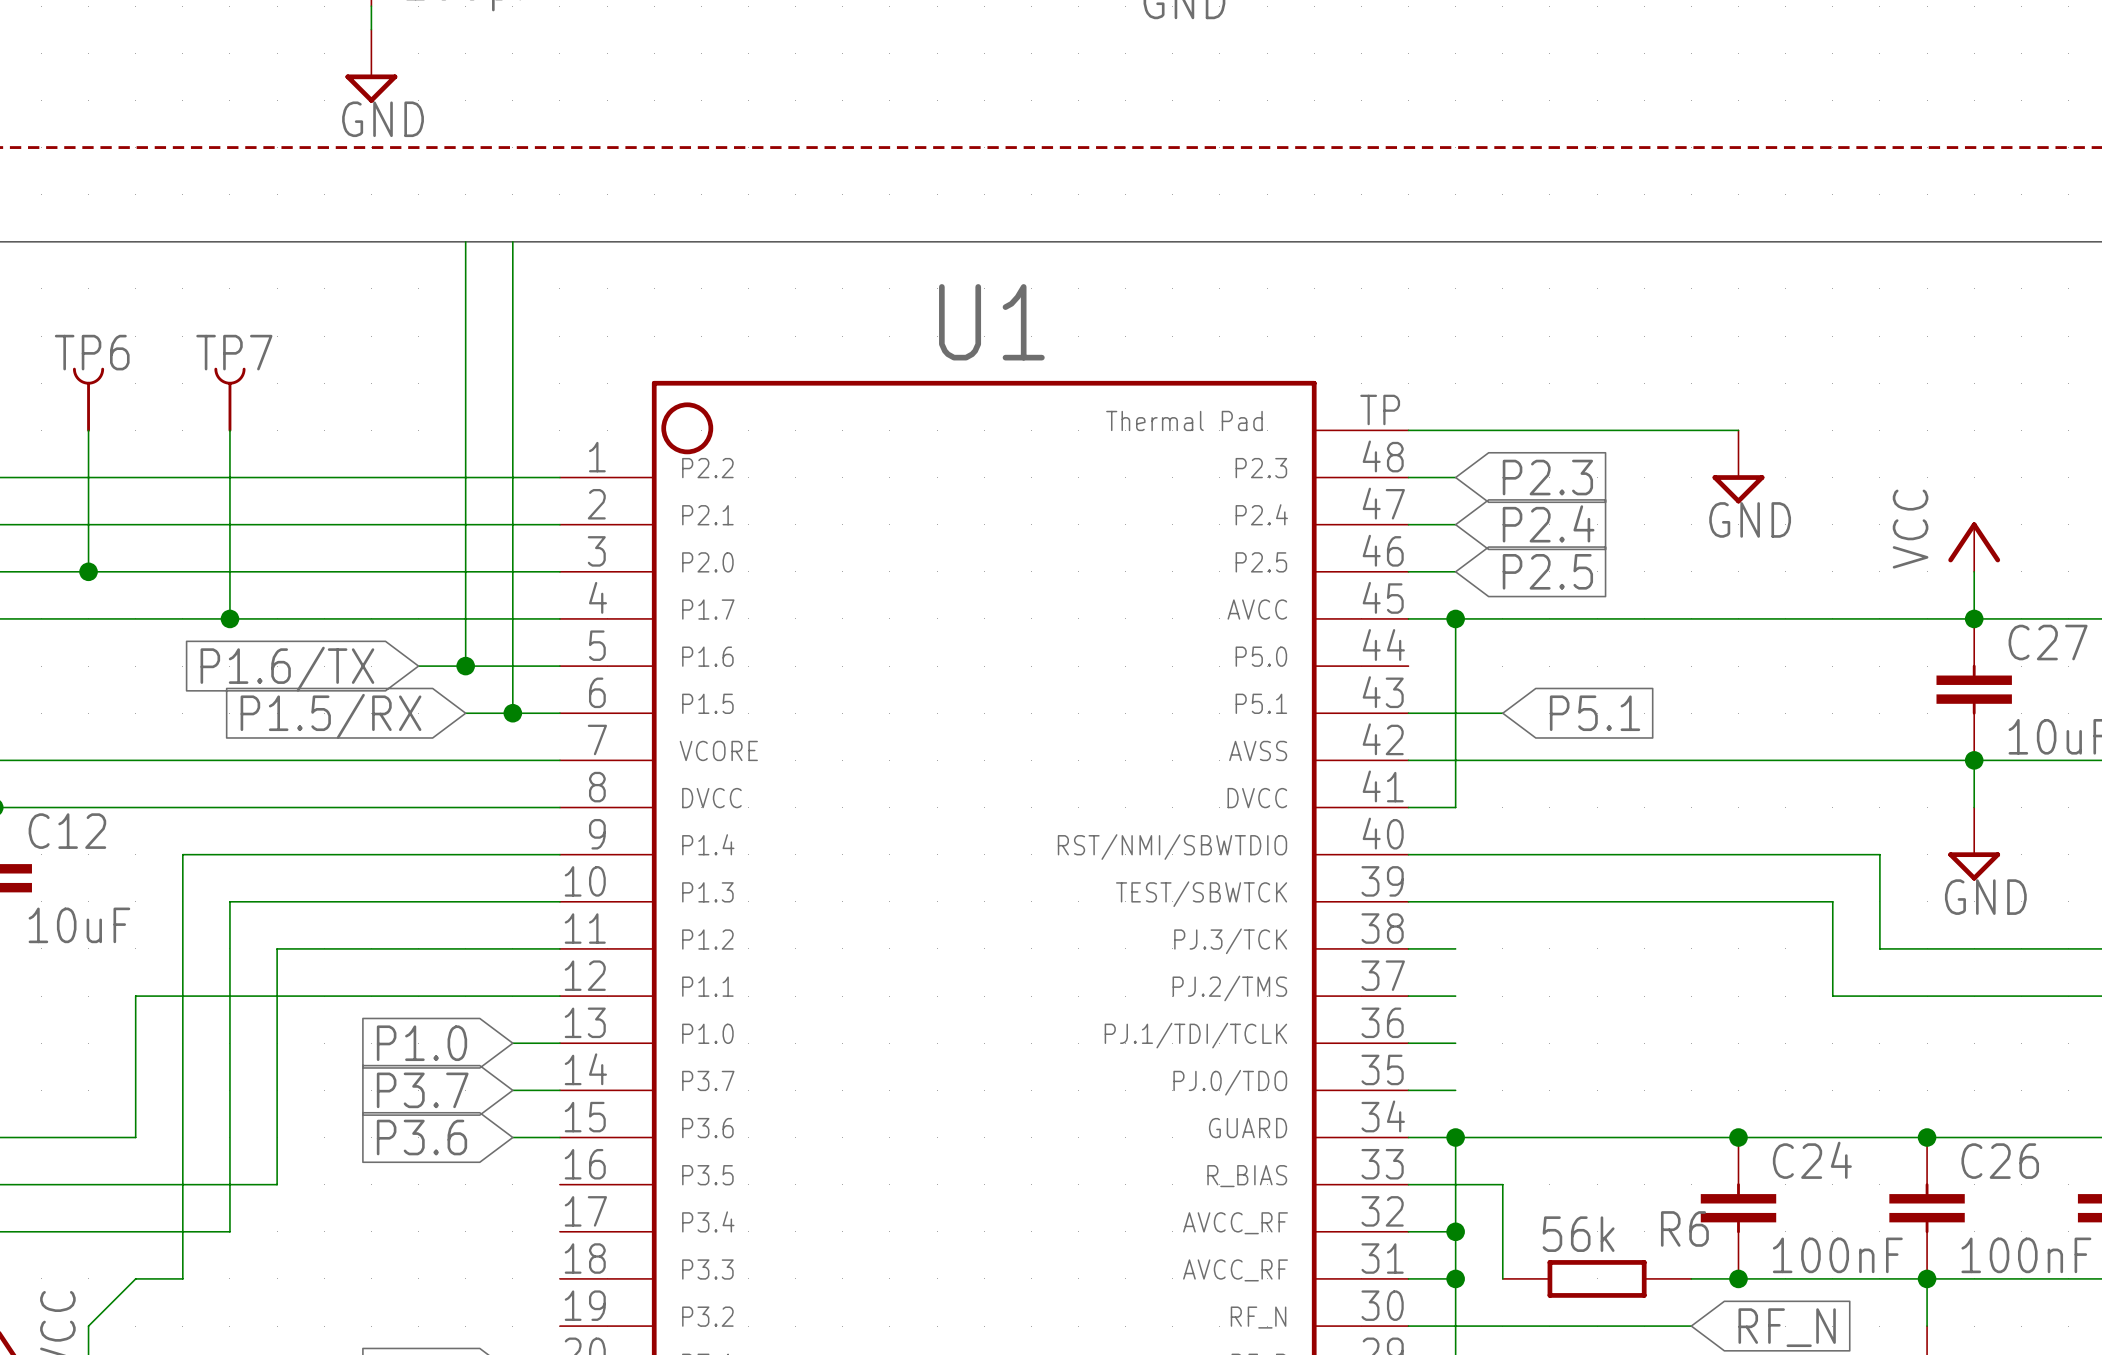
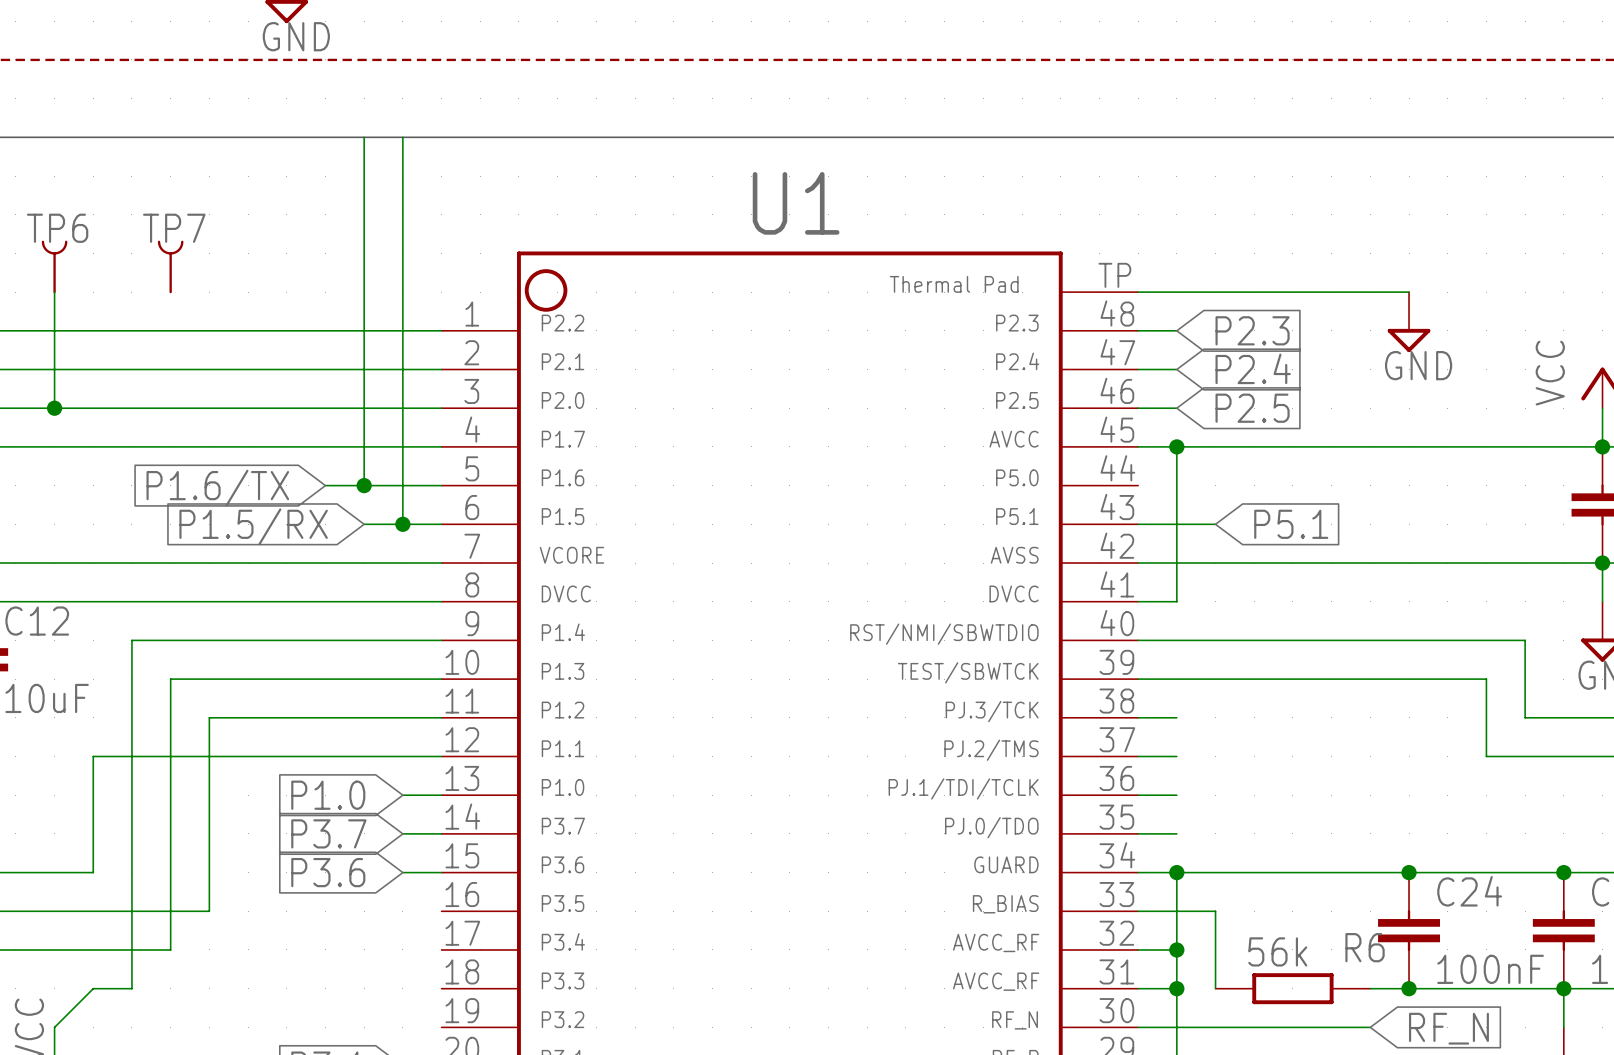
wire: (229, 430) (229, 618) -> none
junction: (229, 618) -> none

